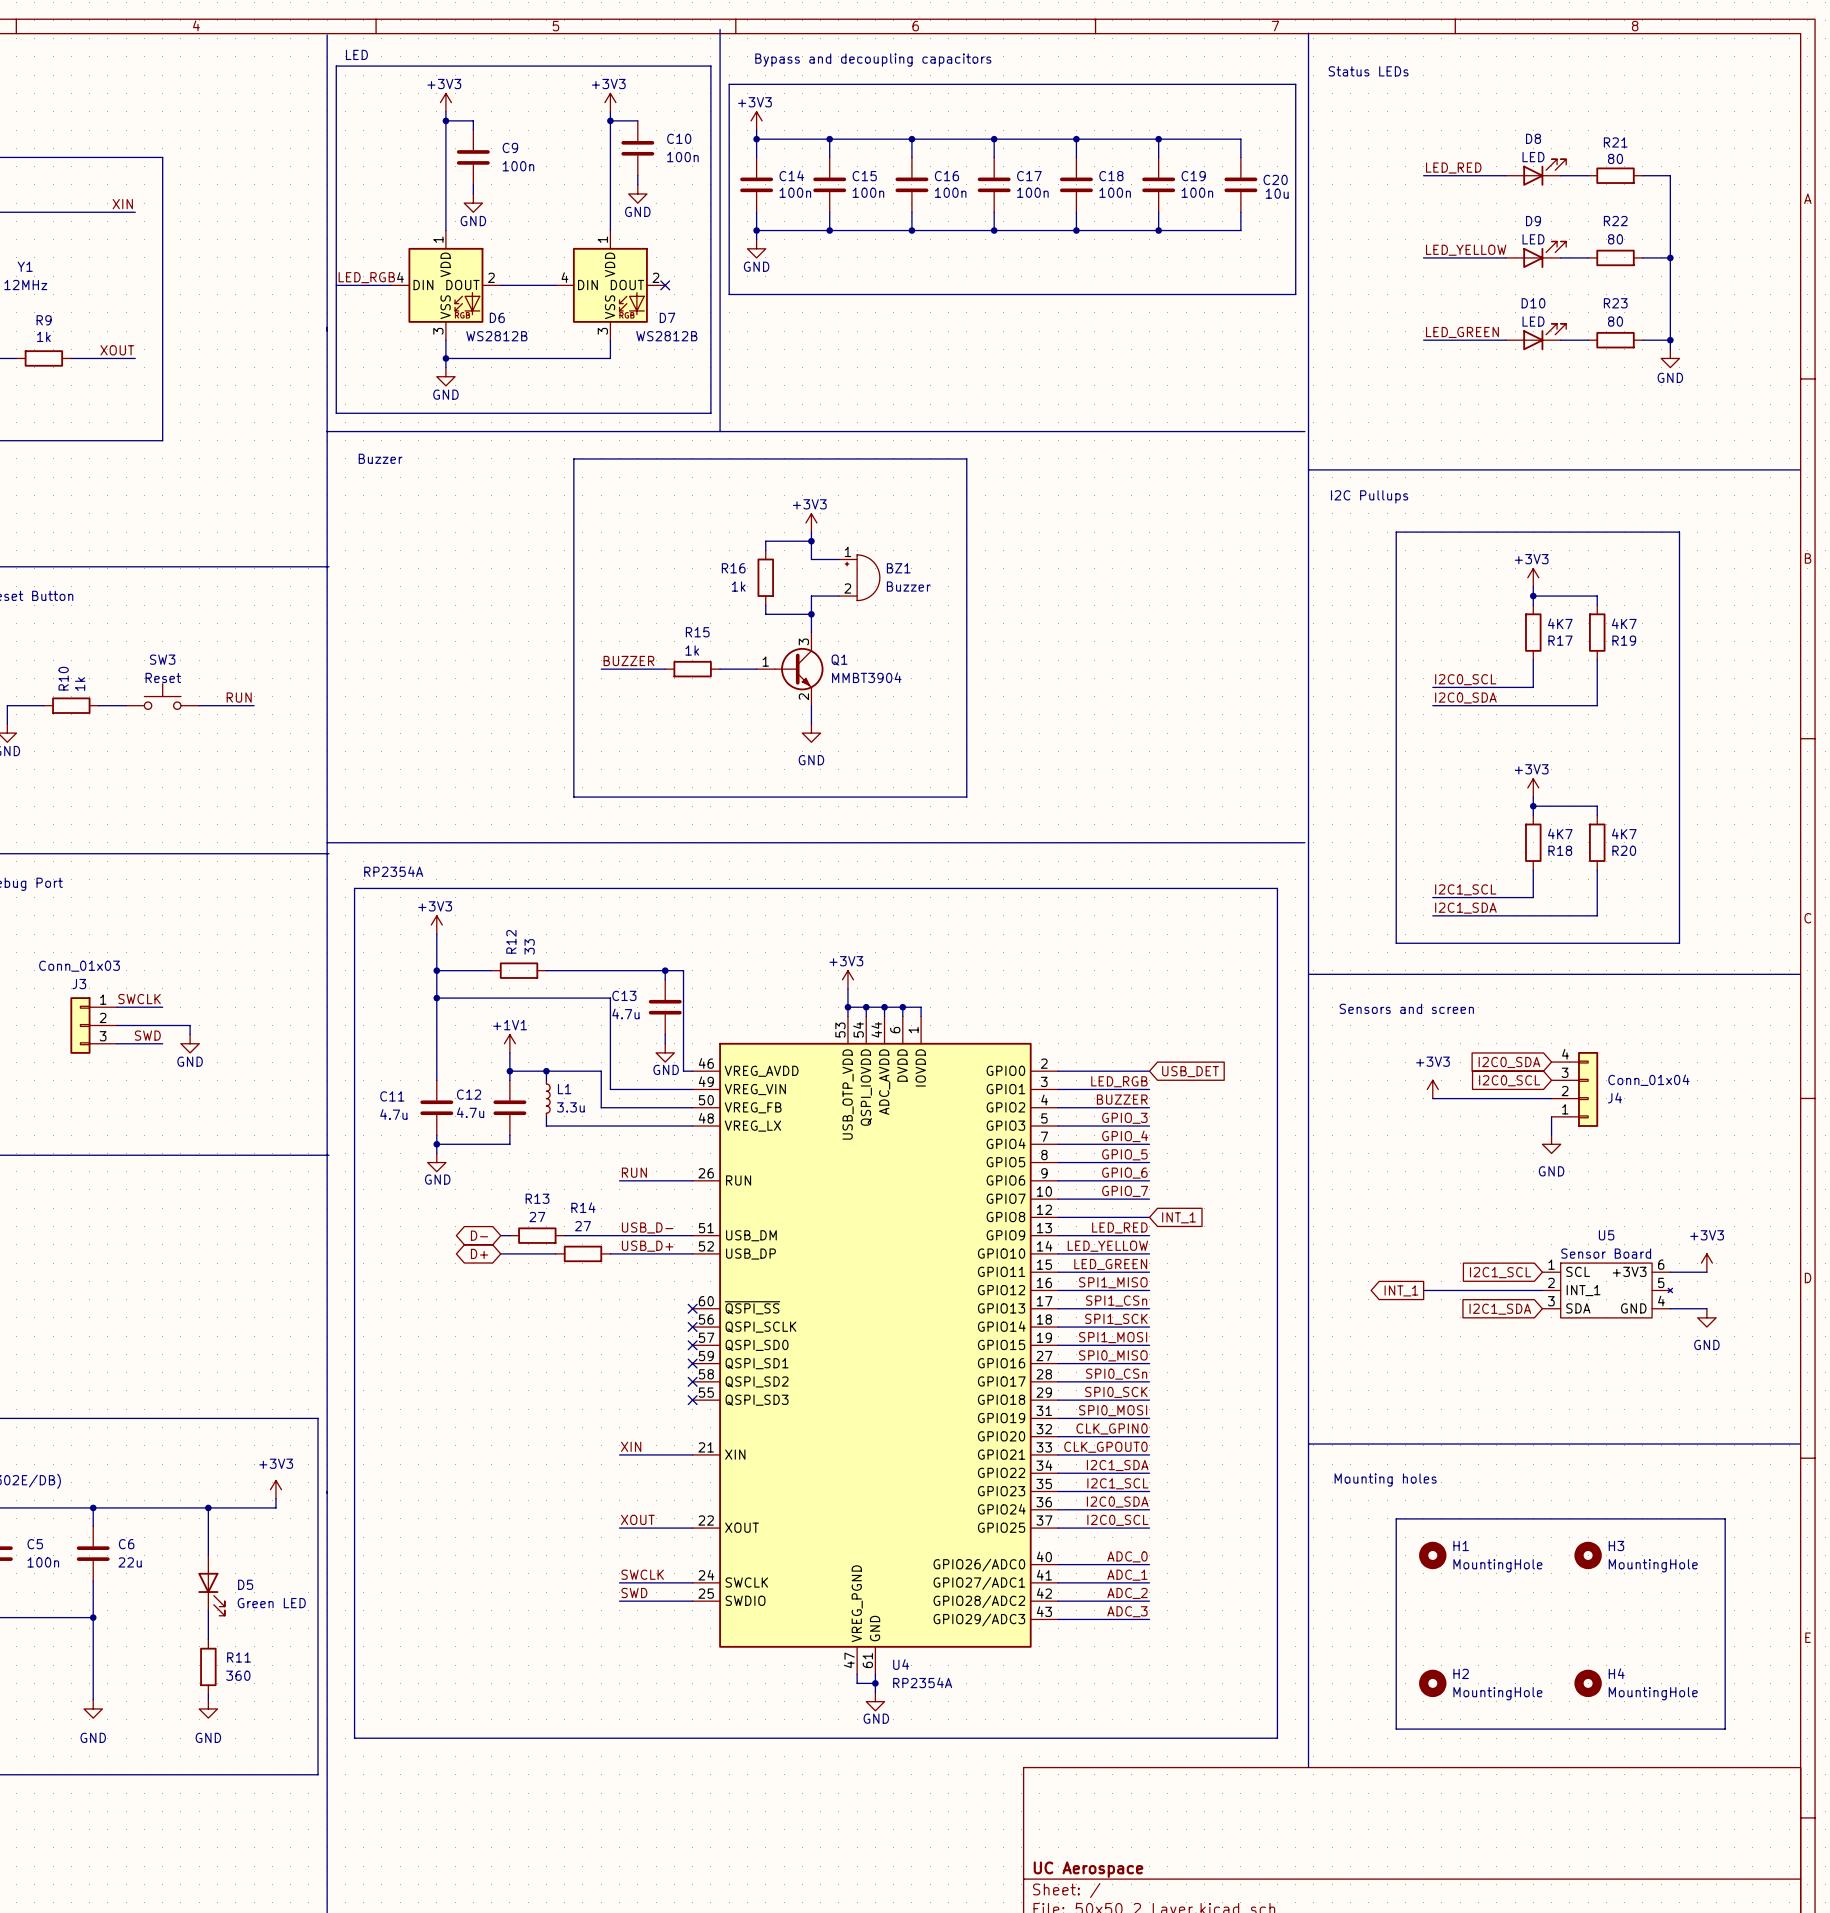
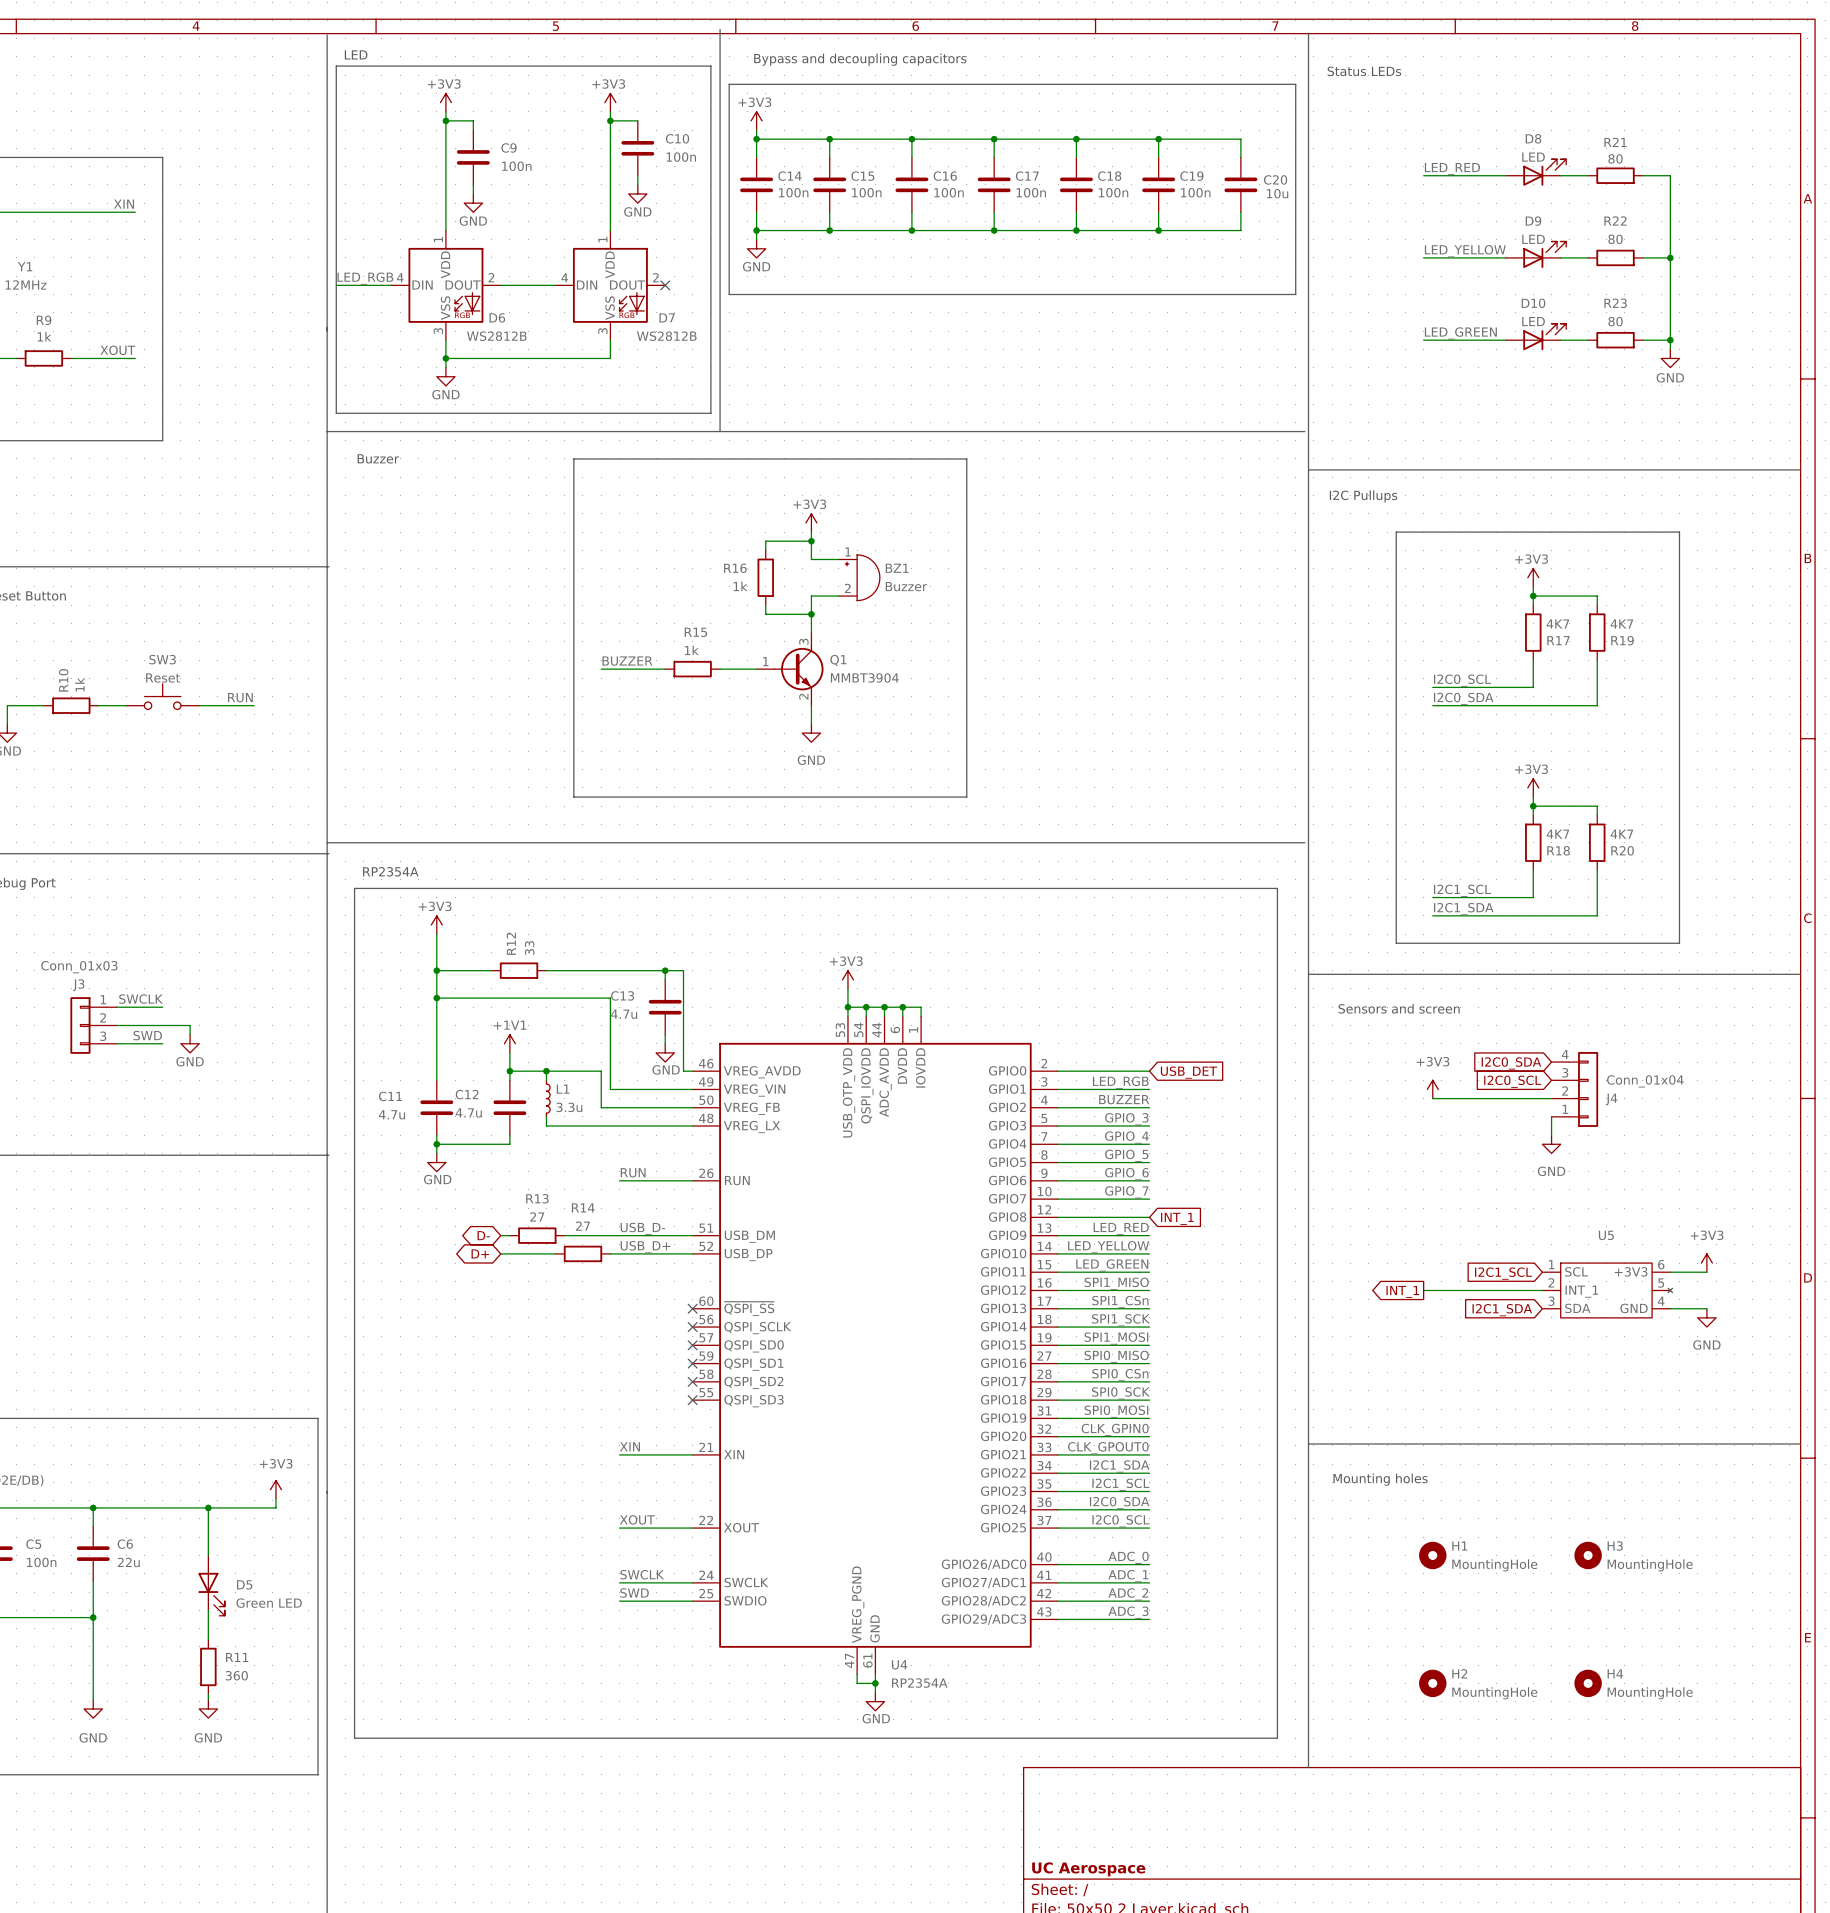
U5 value: Sensor Board (1606, 1253) -> none
line: (1396, 1518) (1725, 1518) (1725, 1729) (1396, 1729) (1396, 1518) -> none

